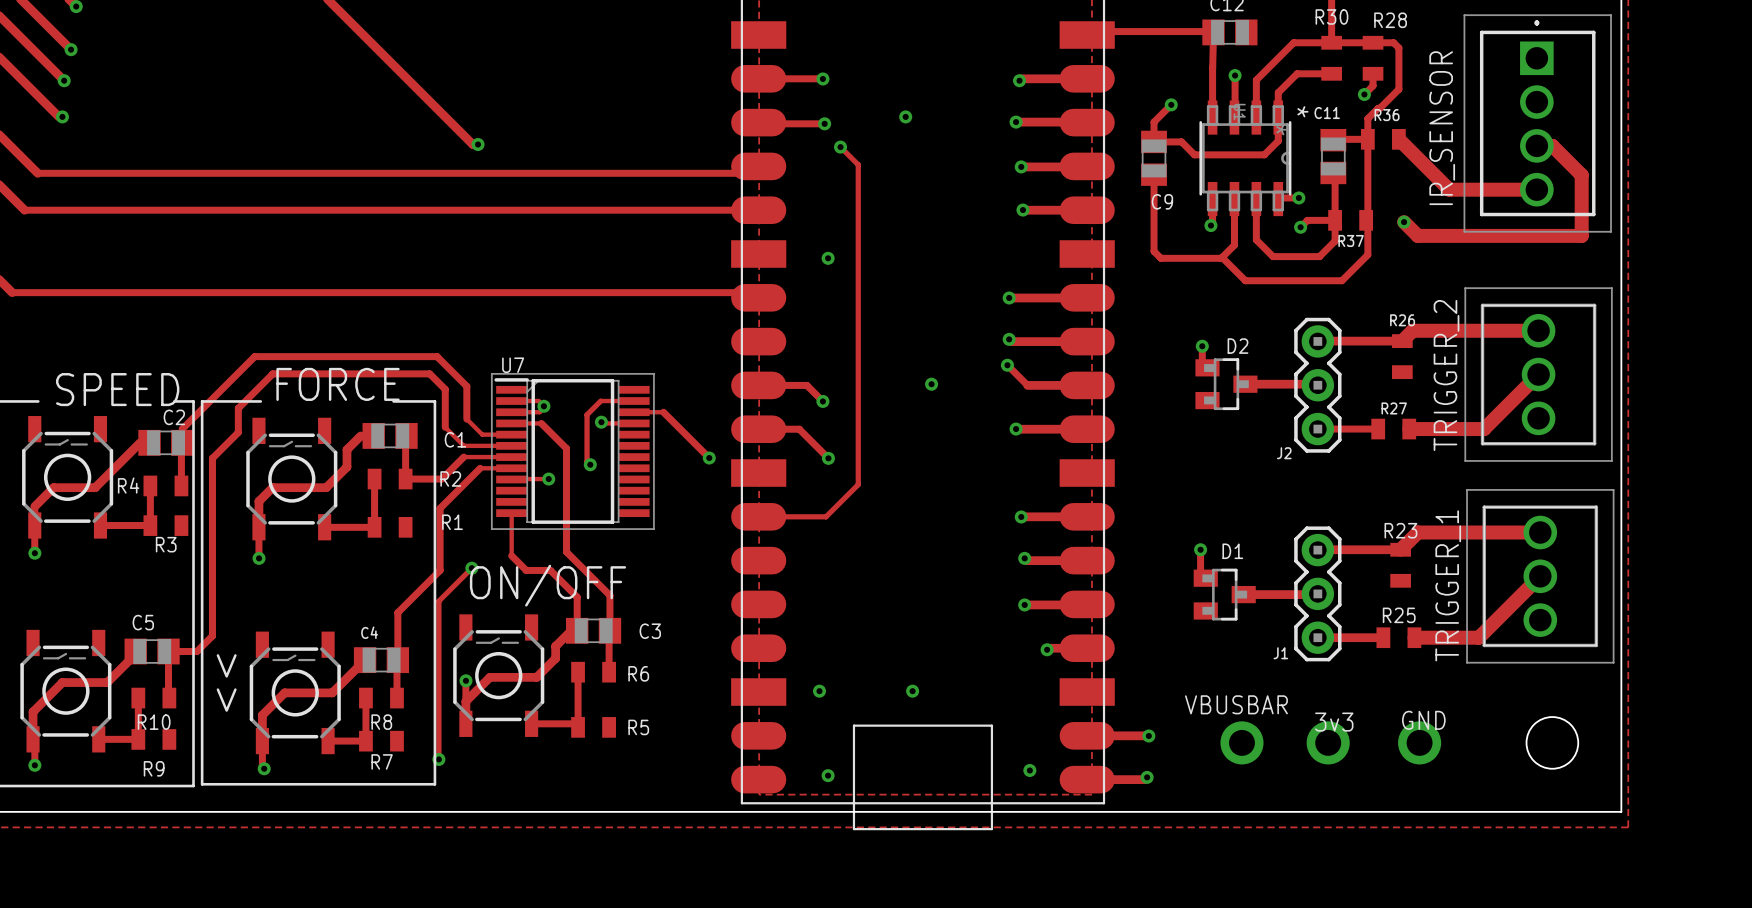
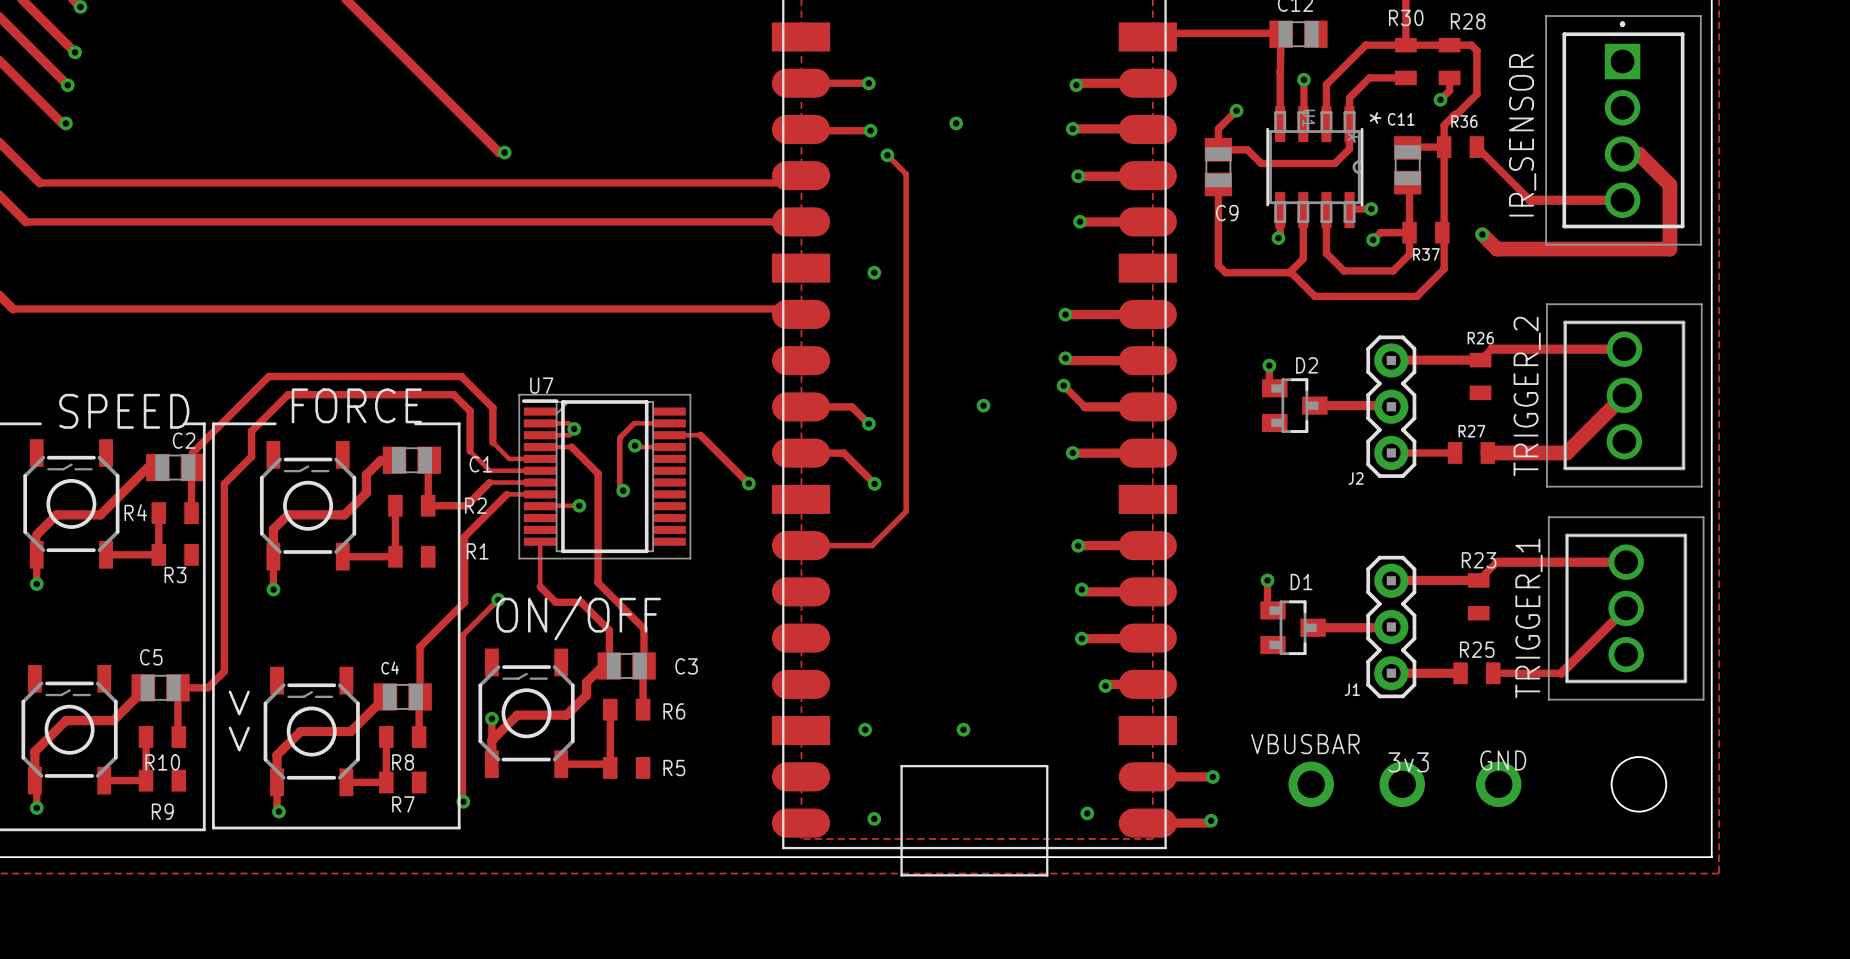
track width: thick (1398, 139) (1449, 189) (1536, 189) -> thin (1476, 147) (1530, 200) (1622, 200)
track width: thick (1538, 330) (1412, 330) (1402, 341) -> thin (1624, 349) (1491, 349) (1480, 360)
track width: thick (1540, 532) (1417, 532) (1400, 549) -> thin (1626, 562) (1496, 562) (1478, 580)
track width: thick (1540, 576) (1478, 637) (1414, 637) -> thin (1626, 608) (1561, 673) (1493, 673)

